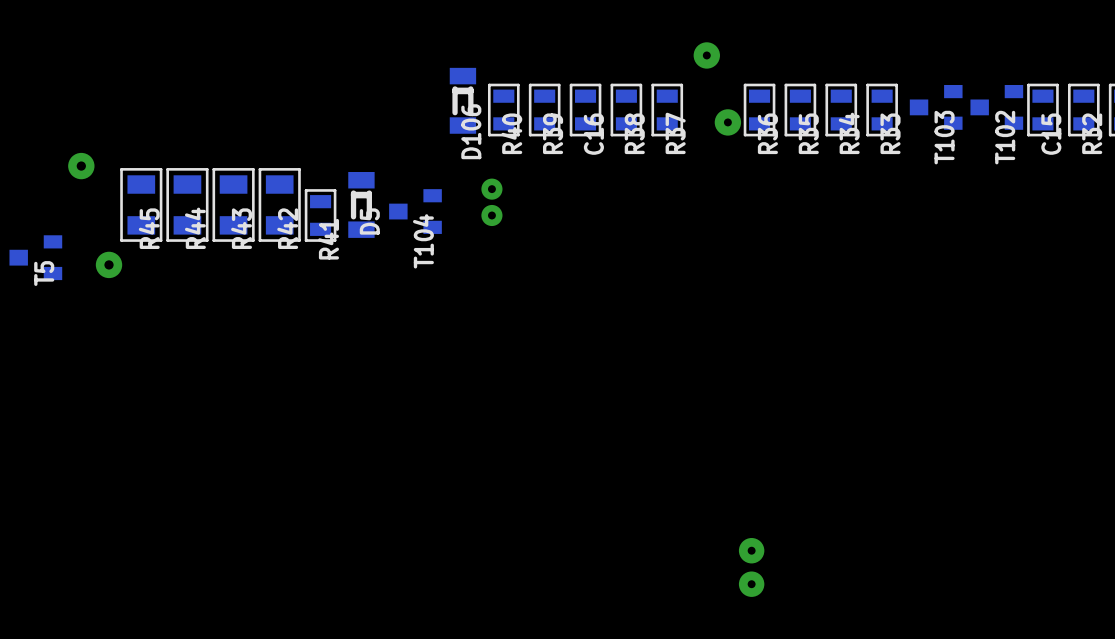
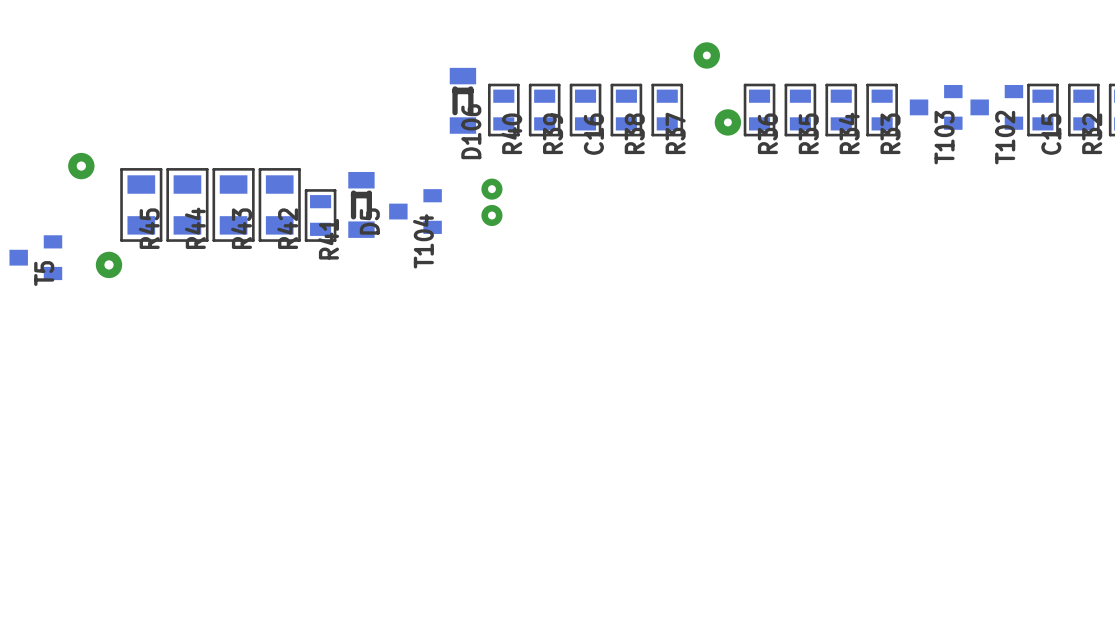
part: (751, 567) -> none

